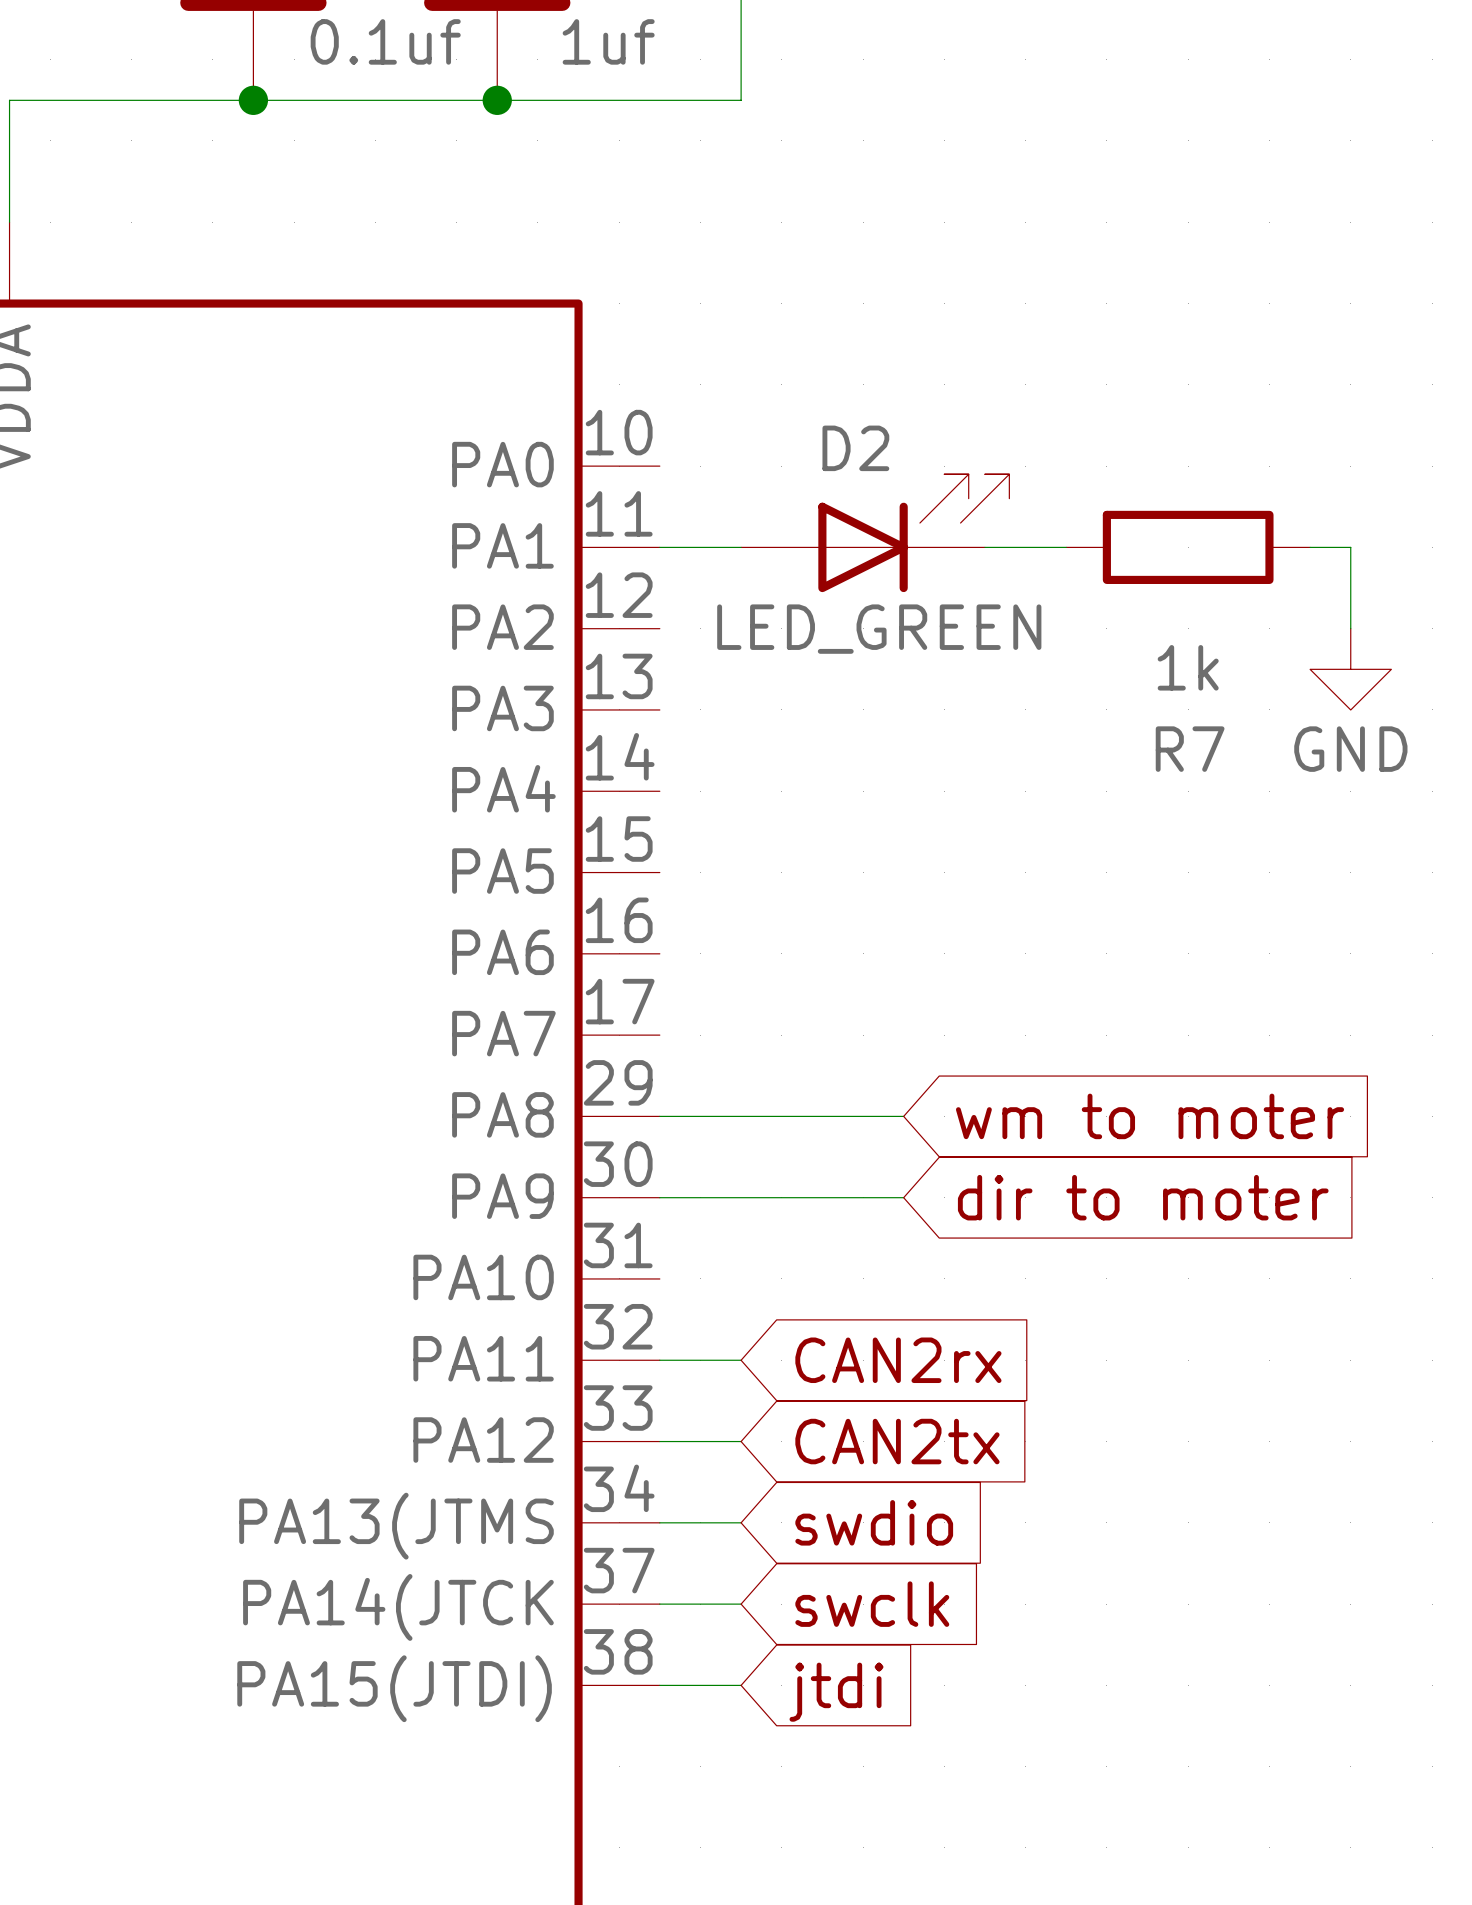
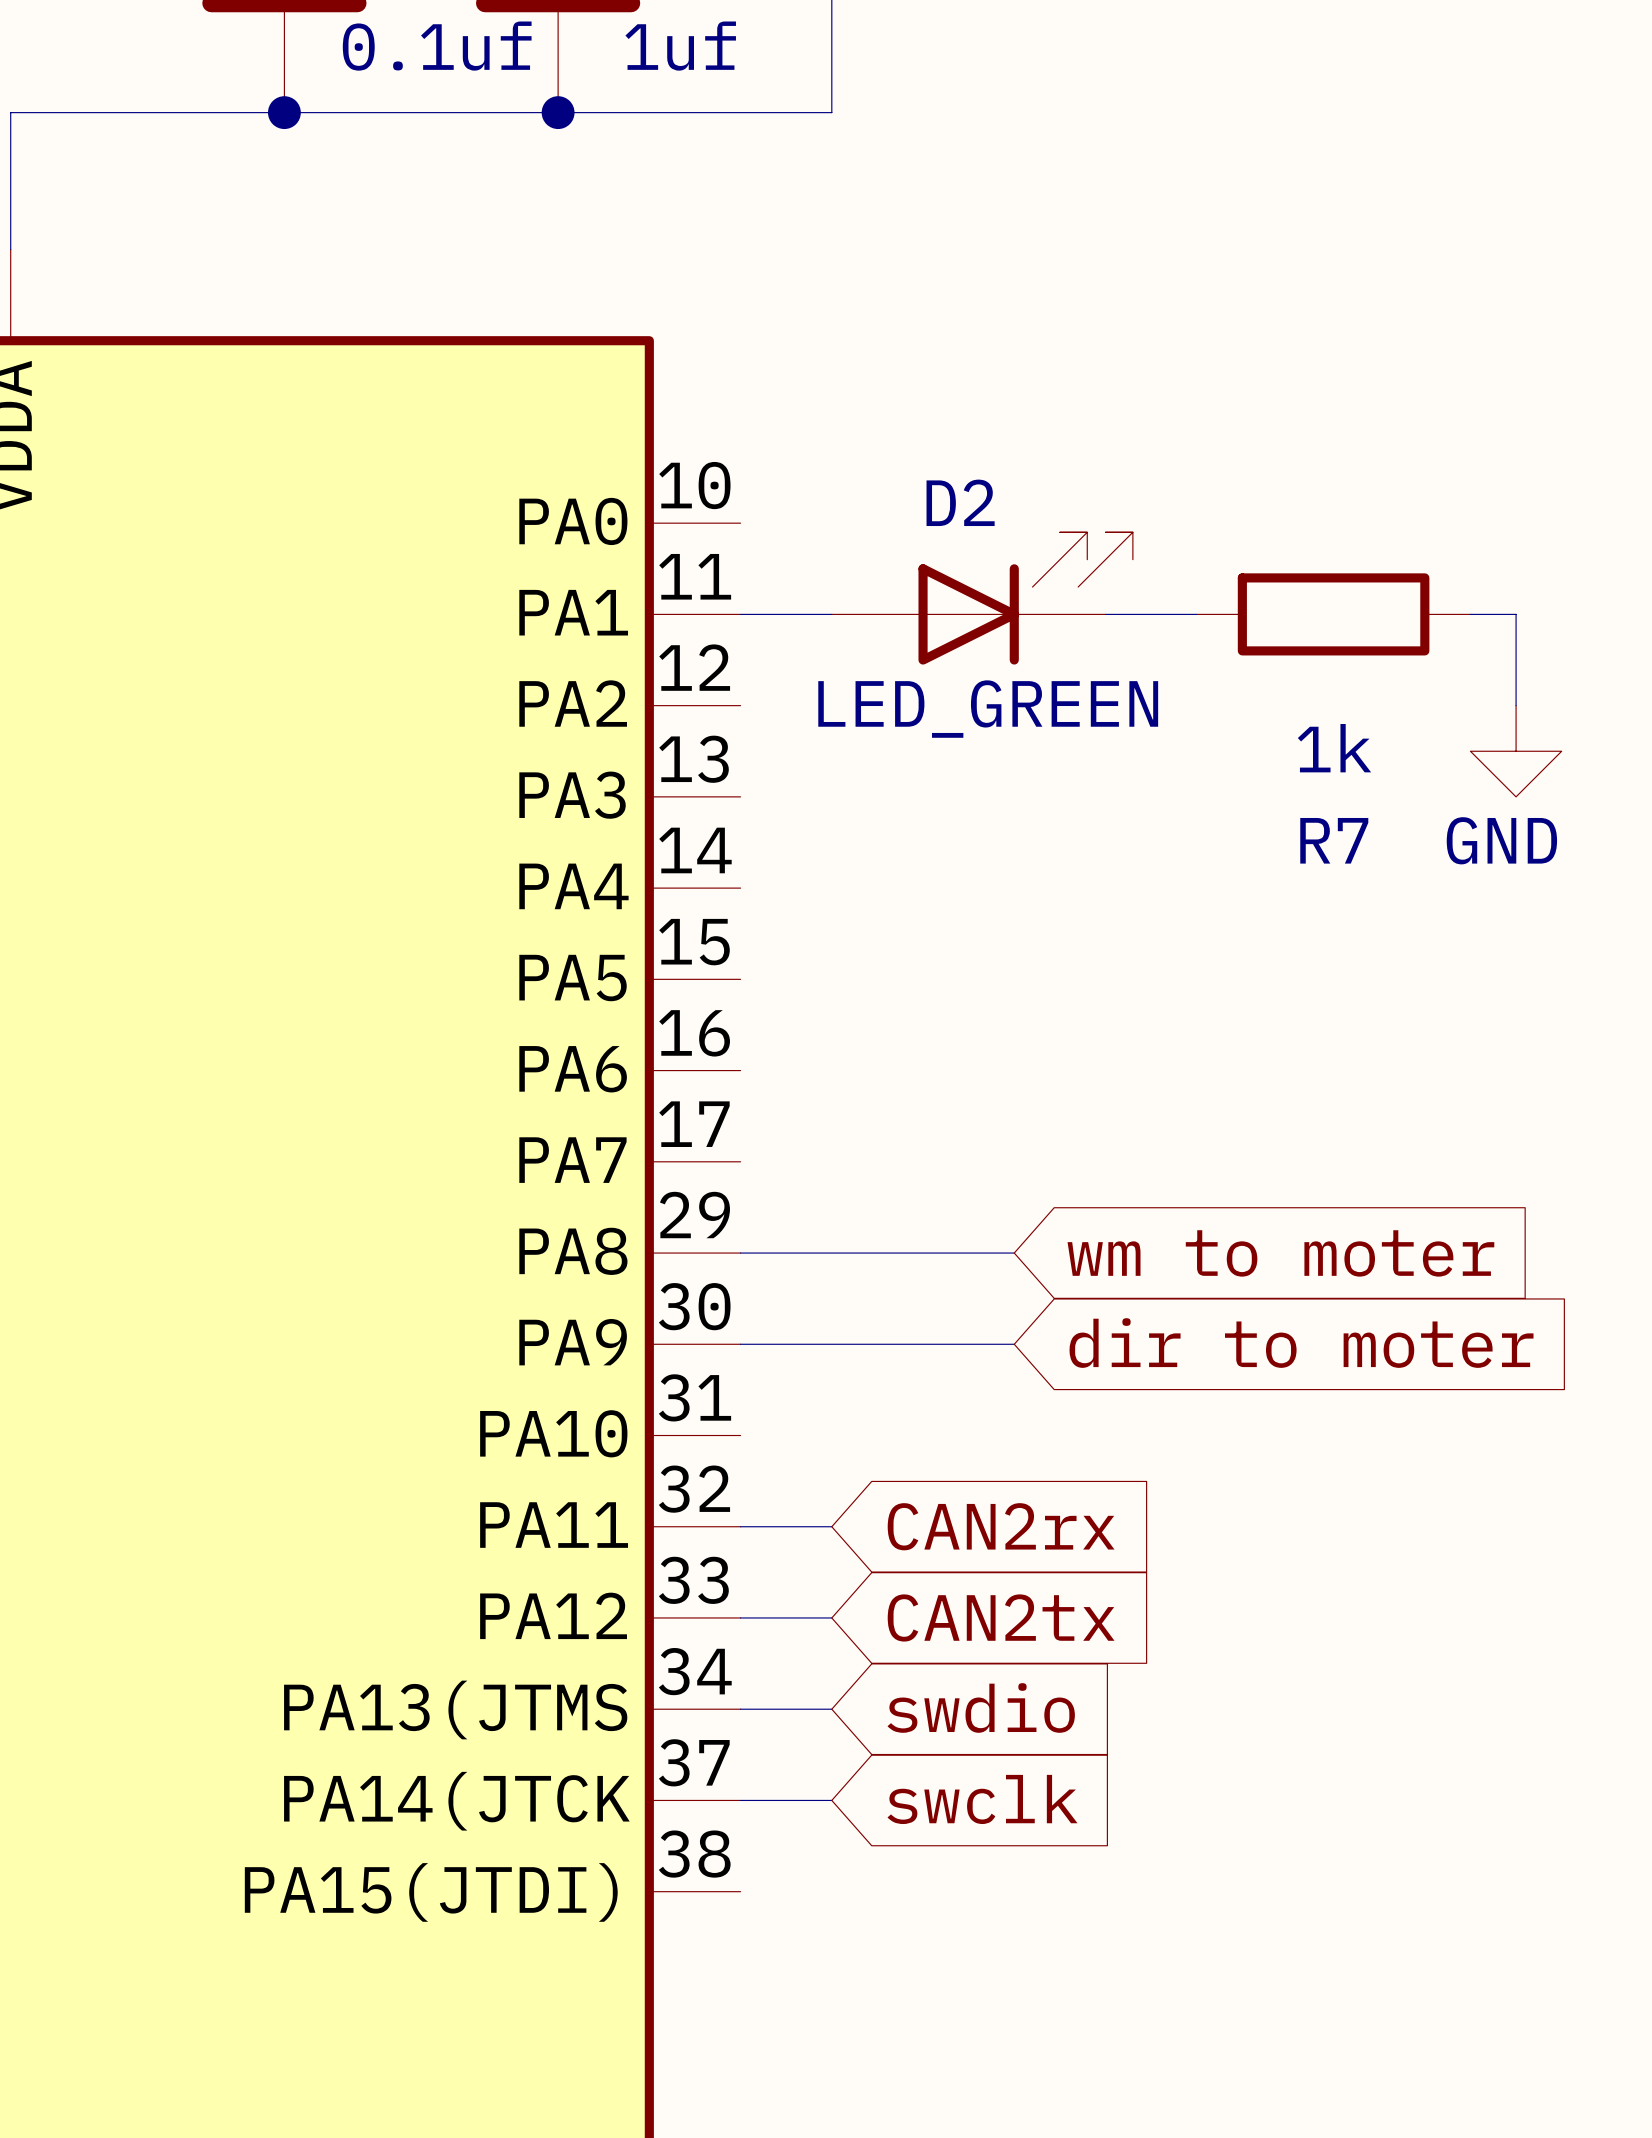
wire: (659, 1685) (741, 1685) -> none
global label: jtdi (836, 1692) -> none

